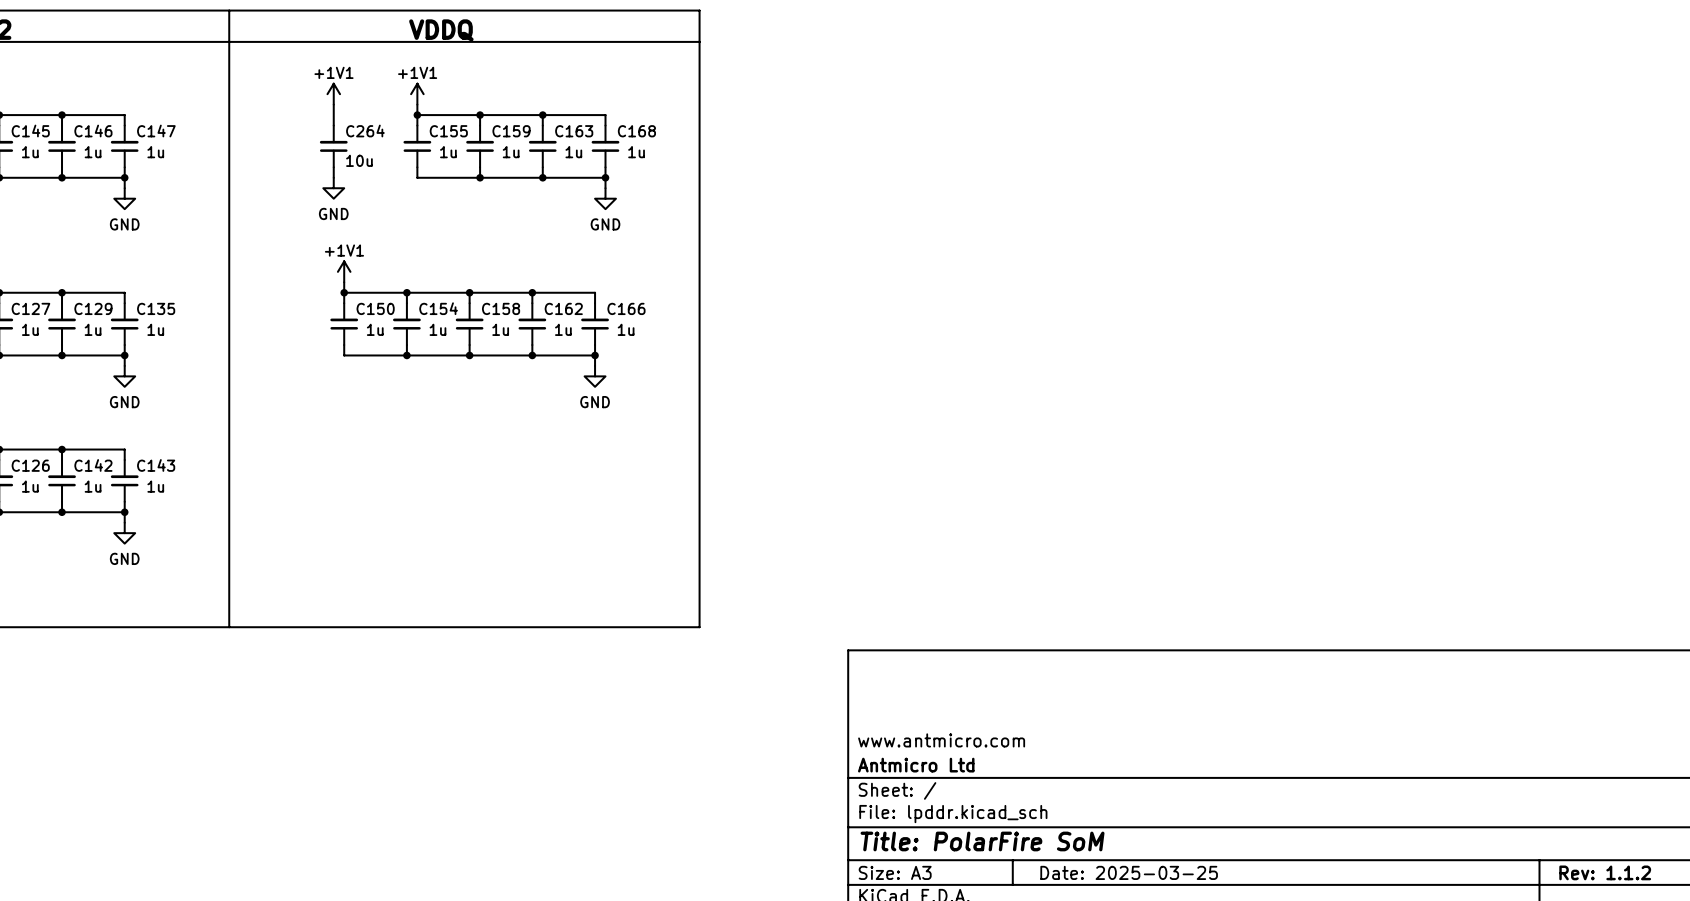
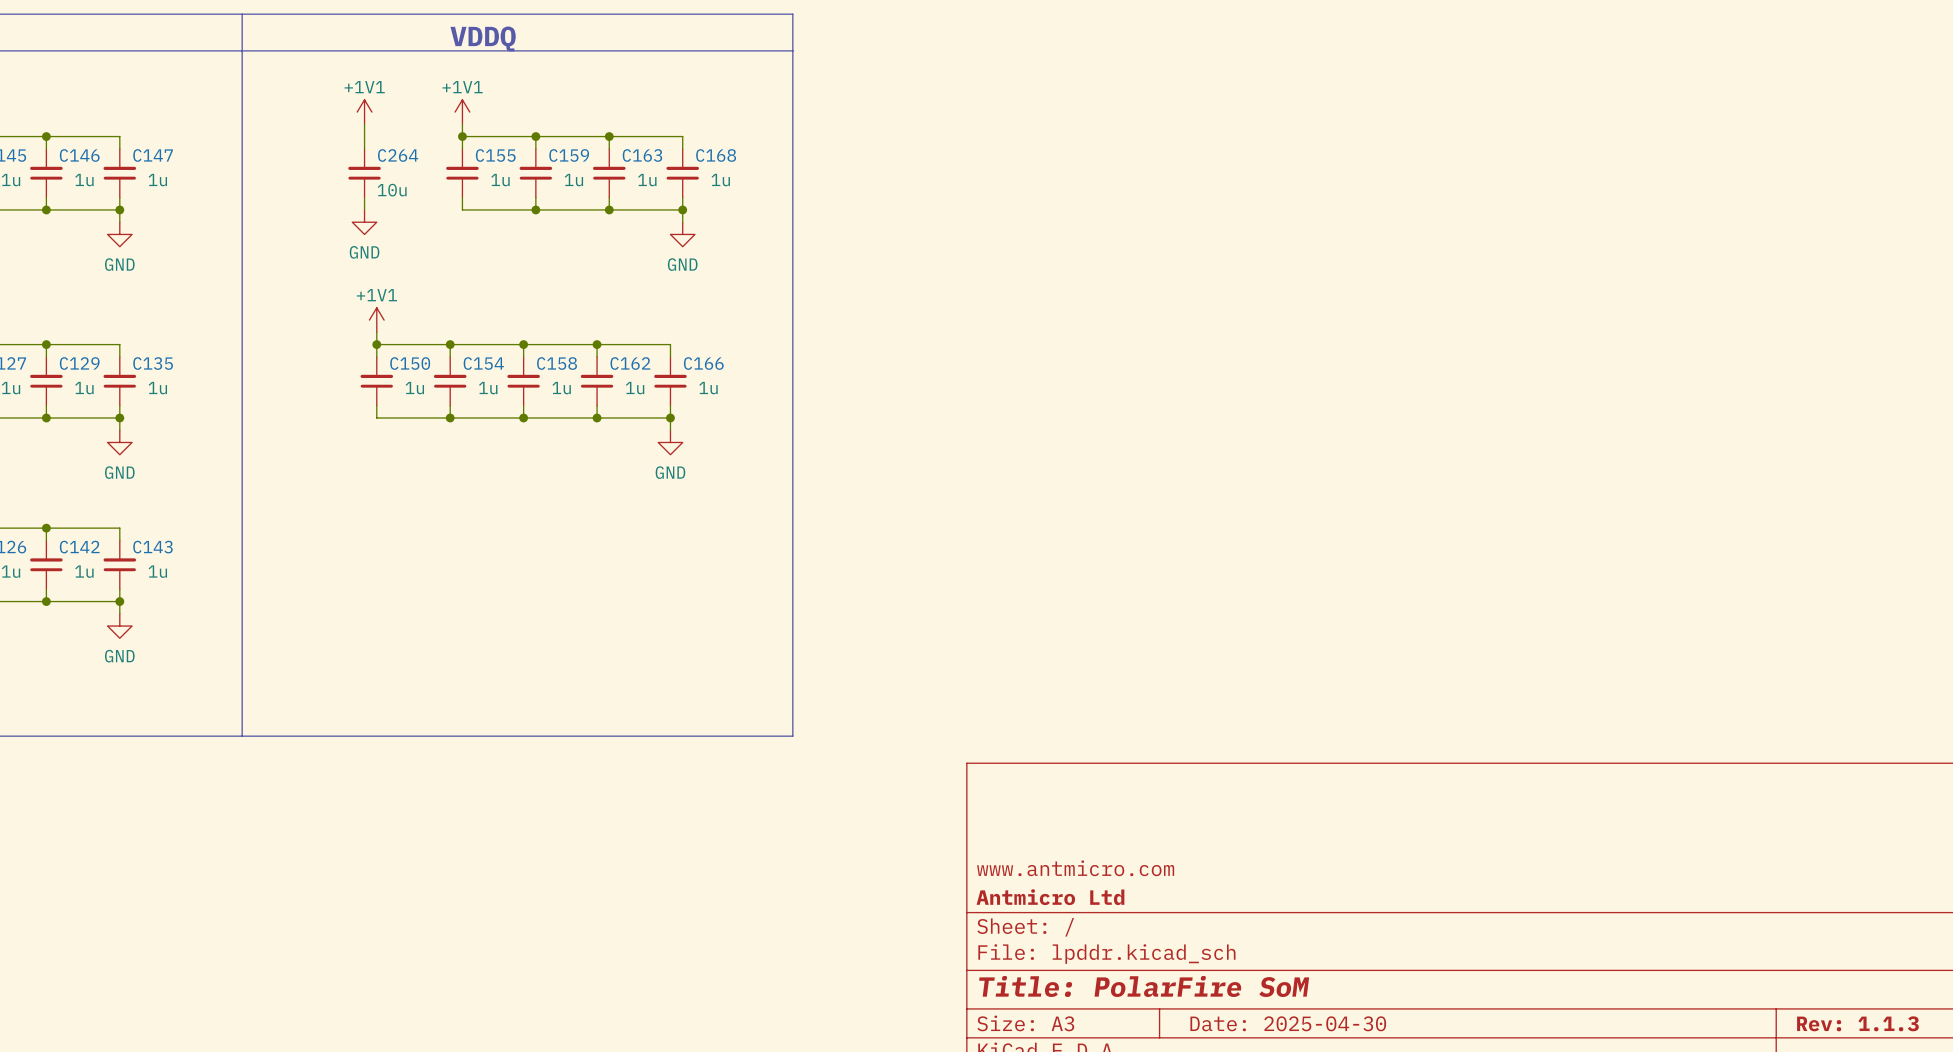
title block: Date: 2025-03-25 (1129, 872) -> Date: 2025-04-30 (1288, 1023)
title block: Rev: 1.1.2 (1605, 872) -> Rev: 1.1.3 (1857, 1023)

